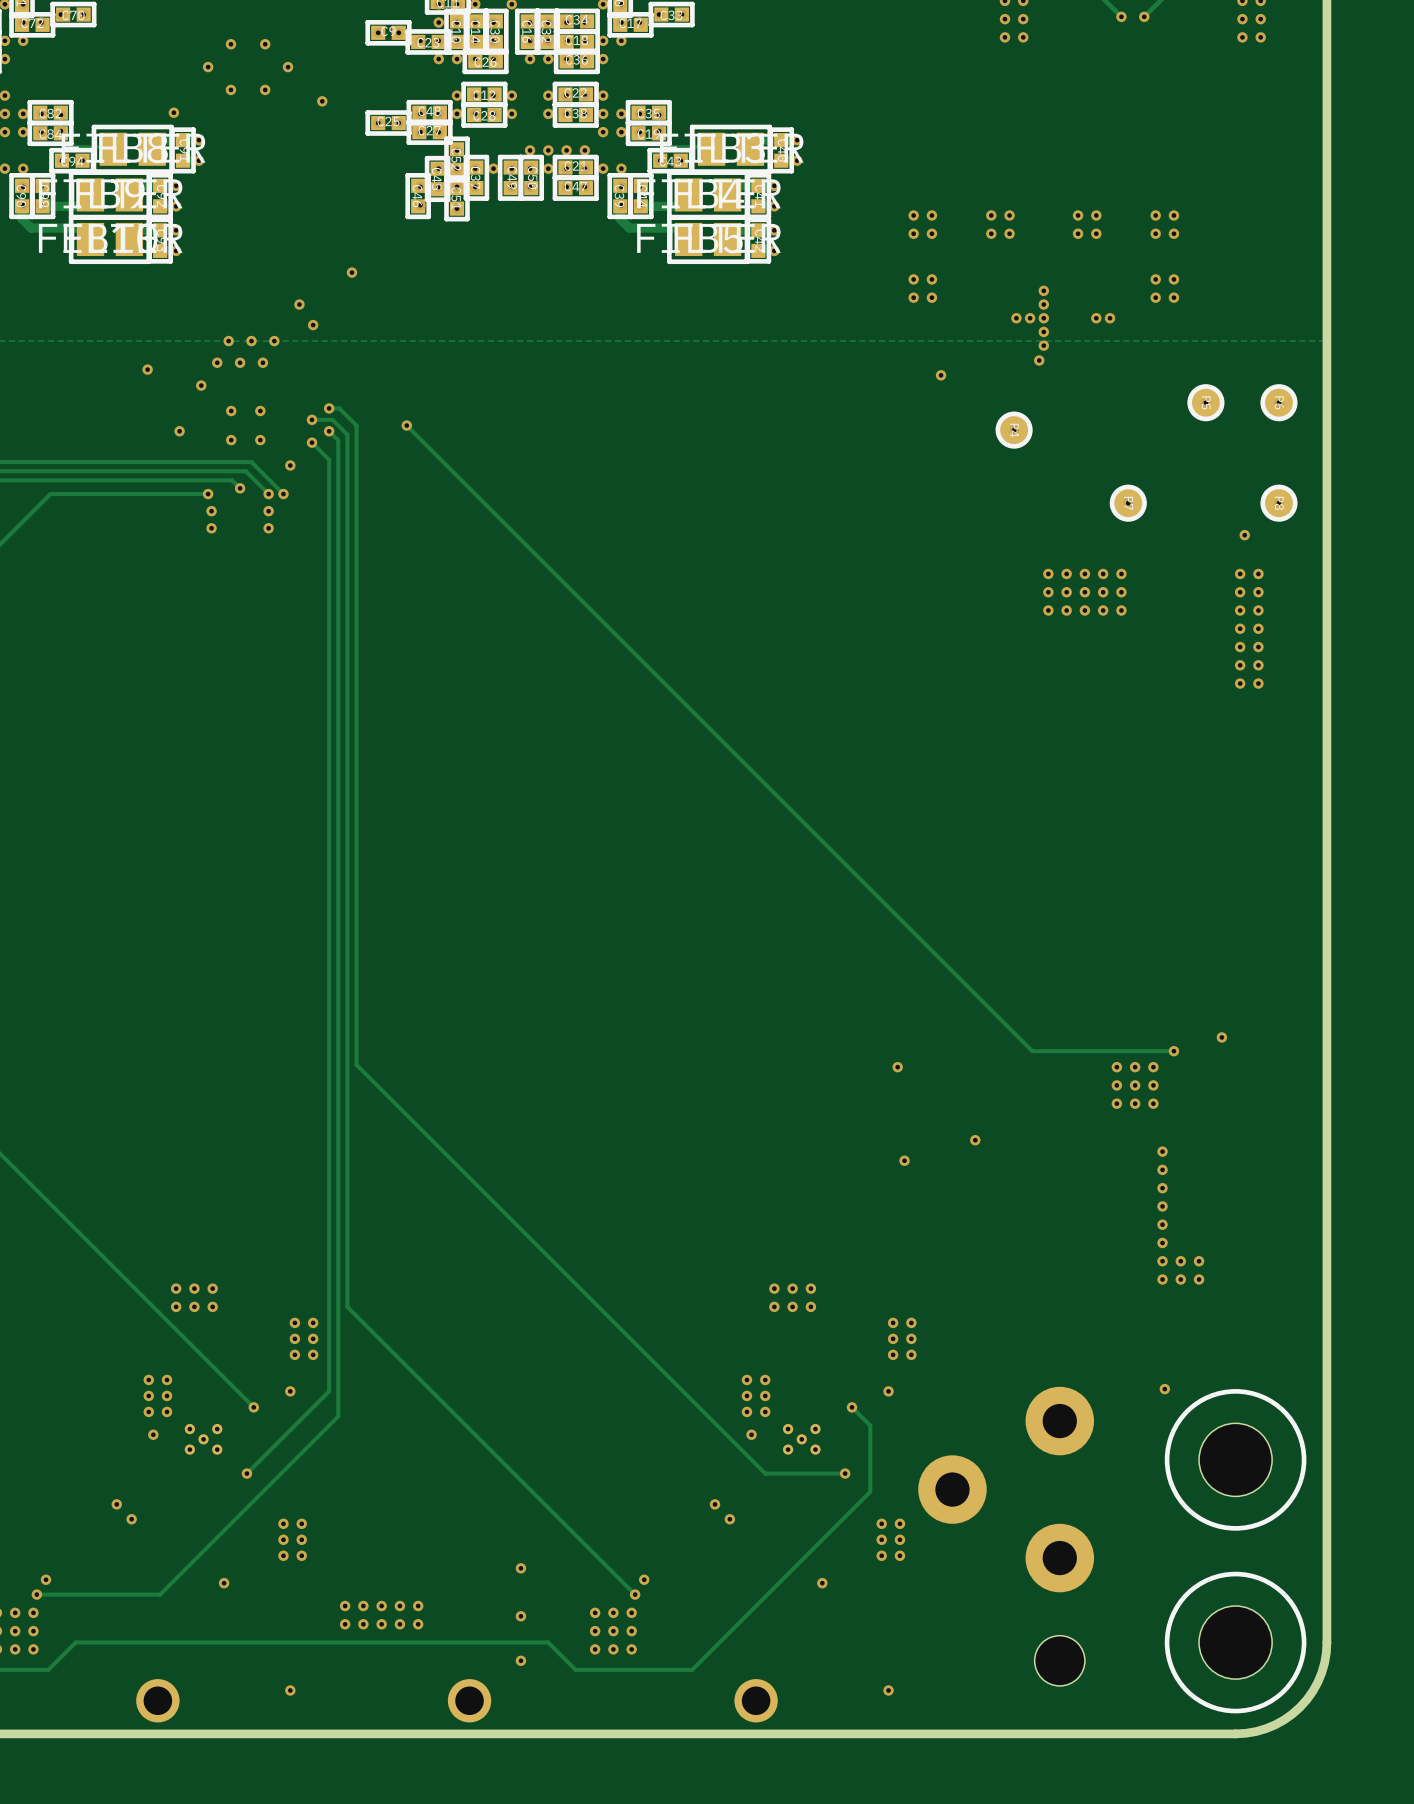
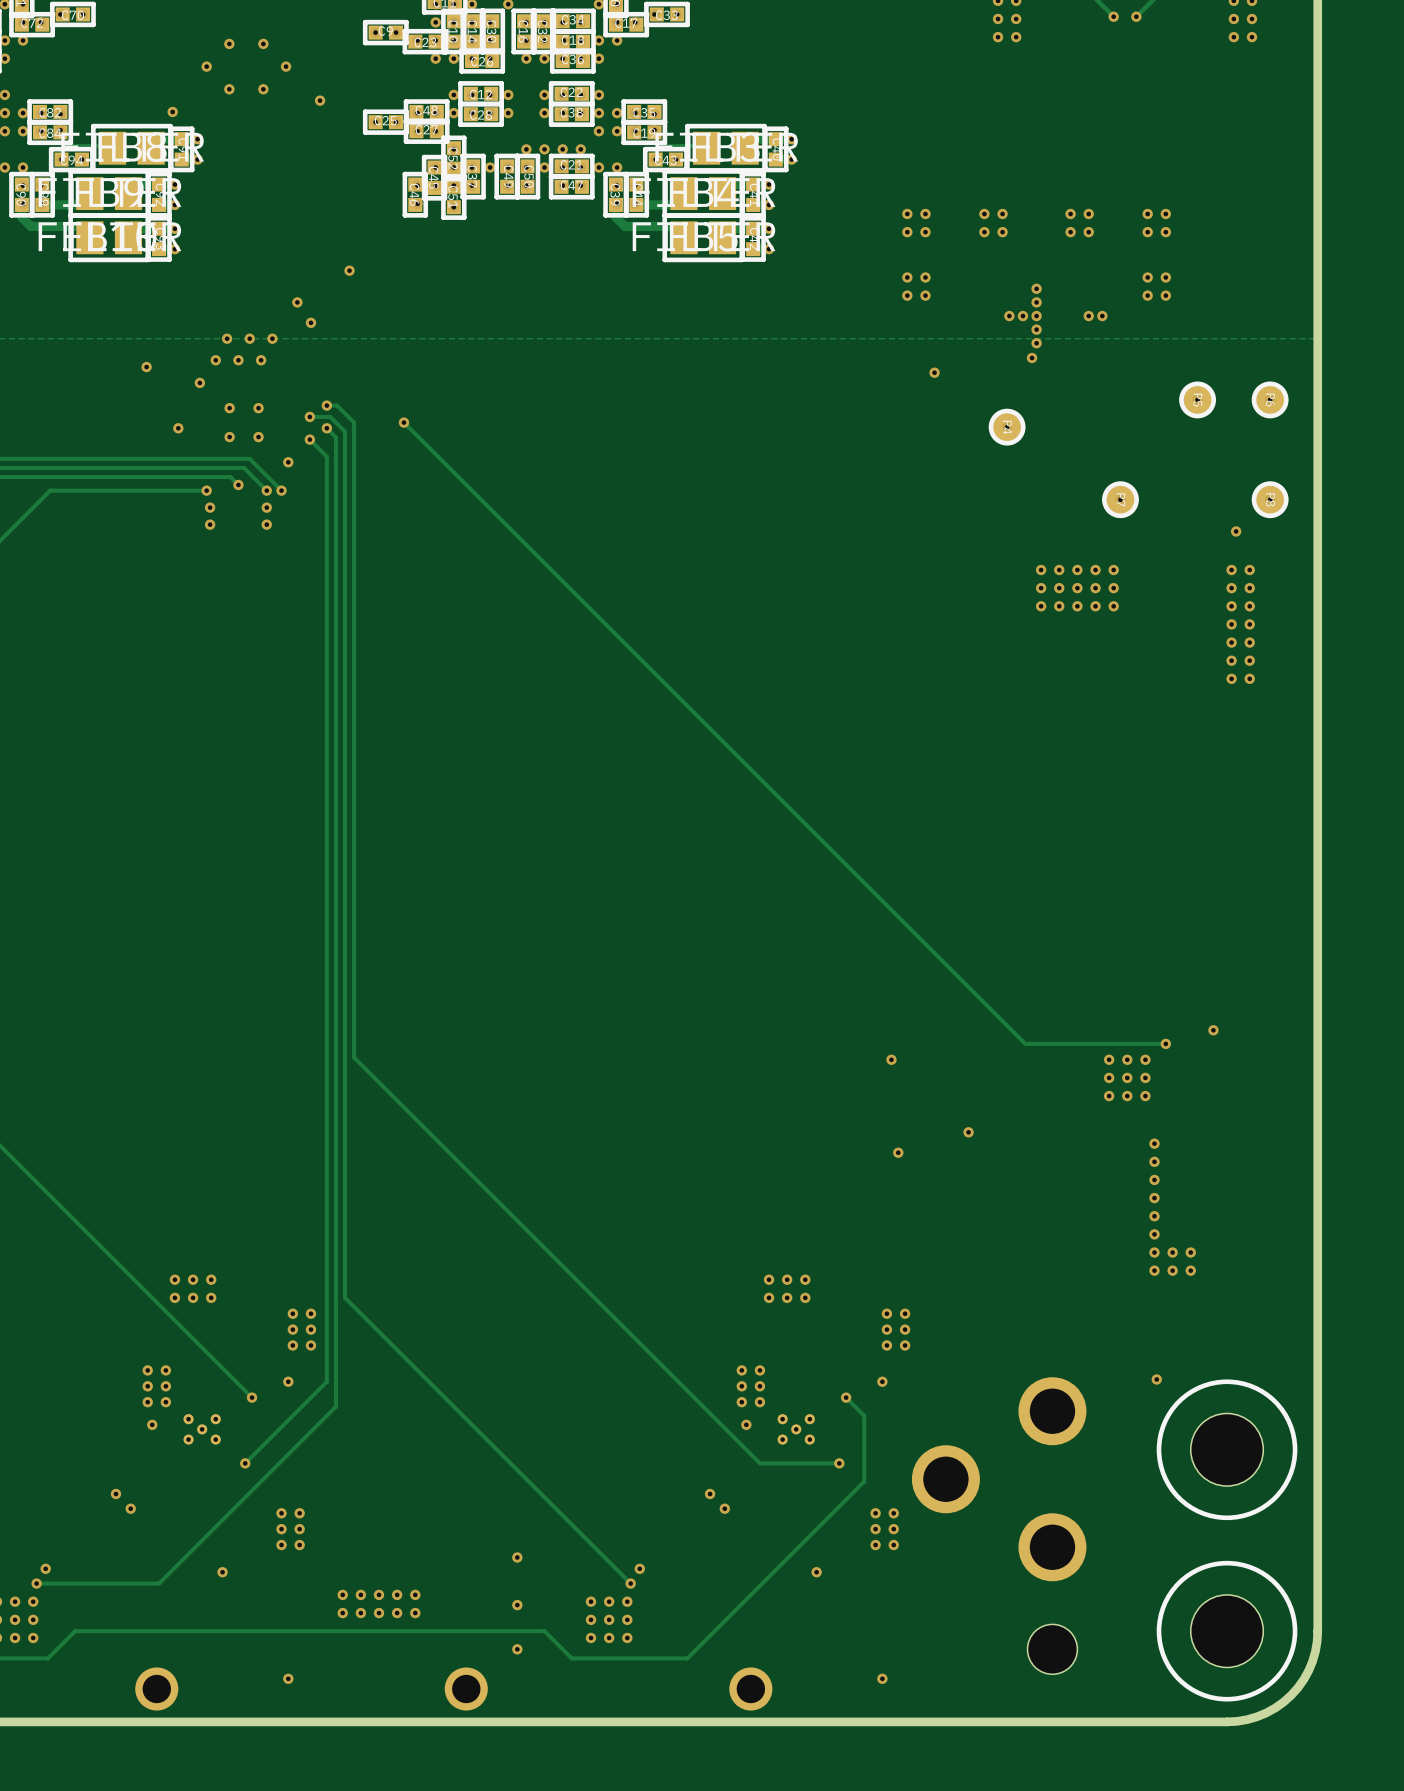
part footprint: [918, 1386, 1095, 1686] -> [911, 1377, 1087, 1675]

